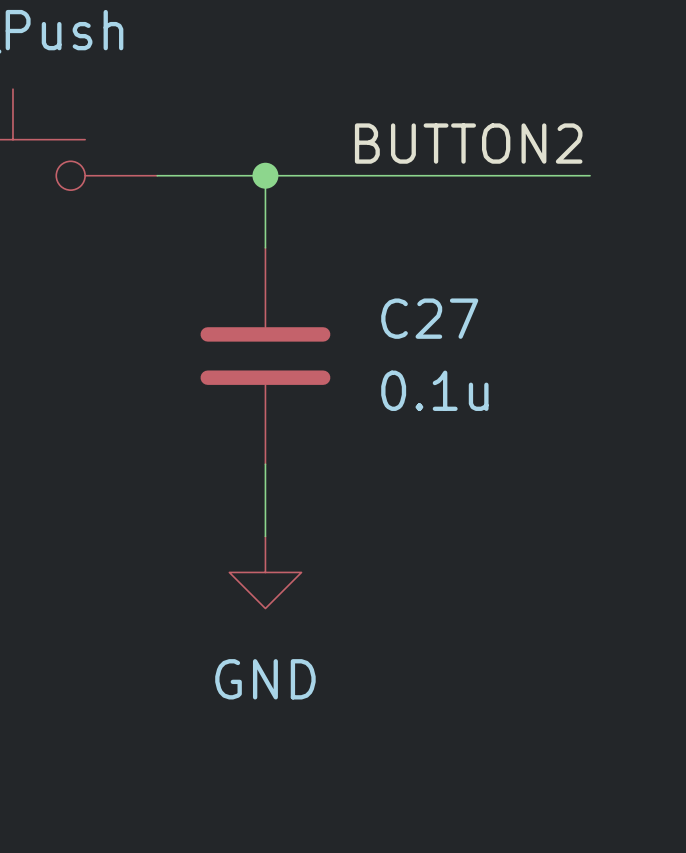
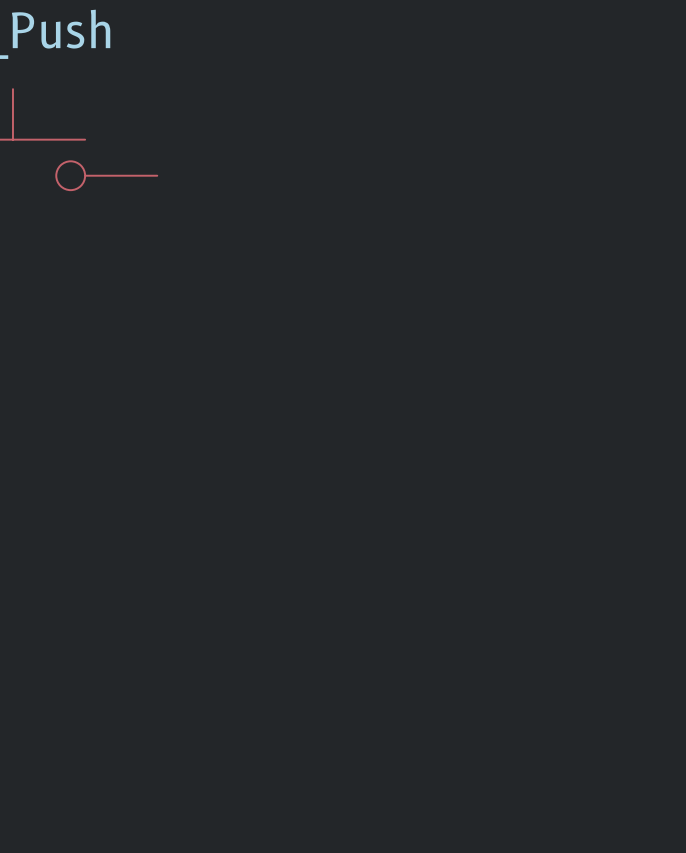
label: BUTTON2 (468, 143) -> none
wire: (157, 175) (590, 175) -> none
wire: (265, 175) (265, 247) -> none
junction: (265, 175) -> none
C27: 0.1u (265, 356) -> none
wire: (265, 464) (265, 536) -> none
power symbol: GND (265, 572) -> none

